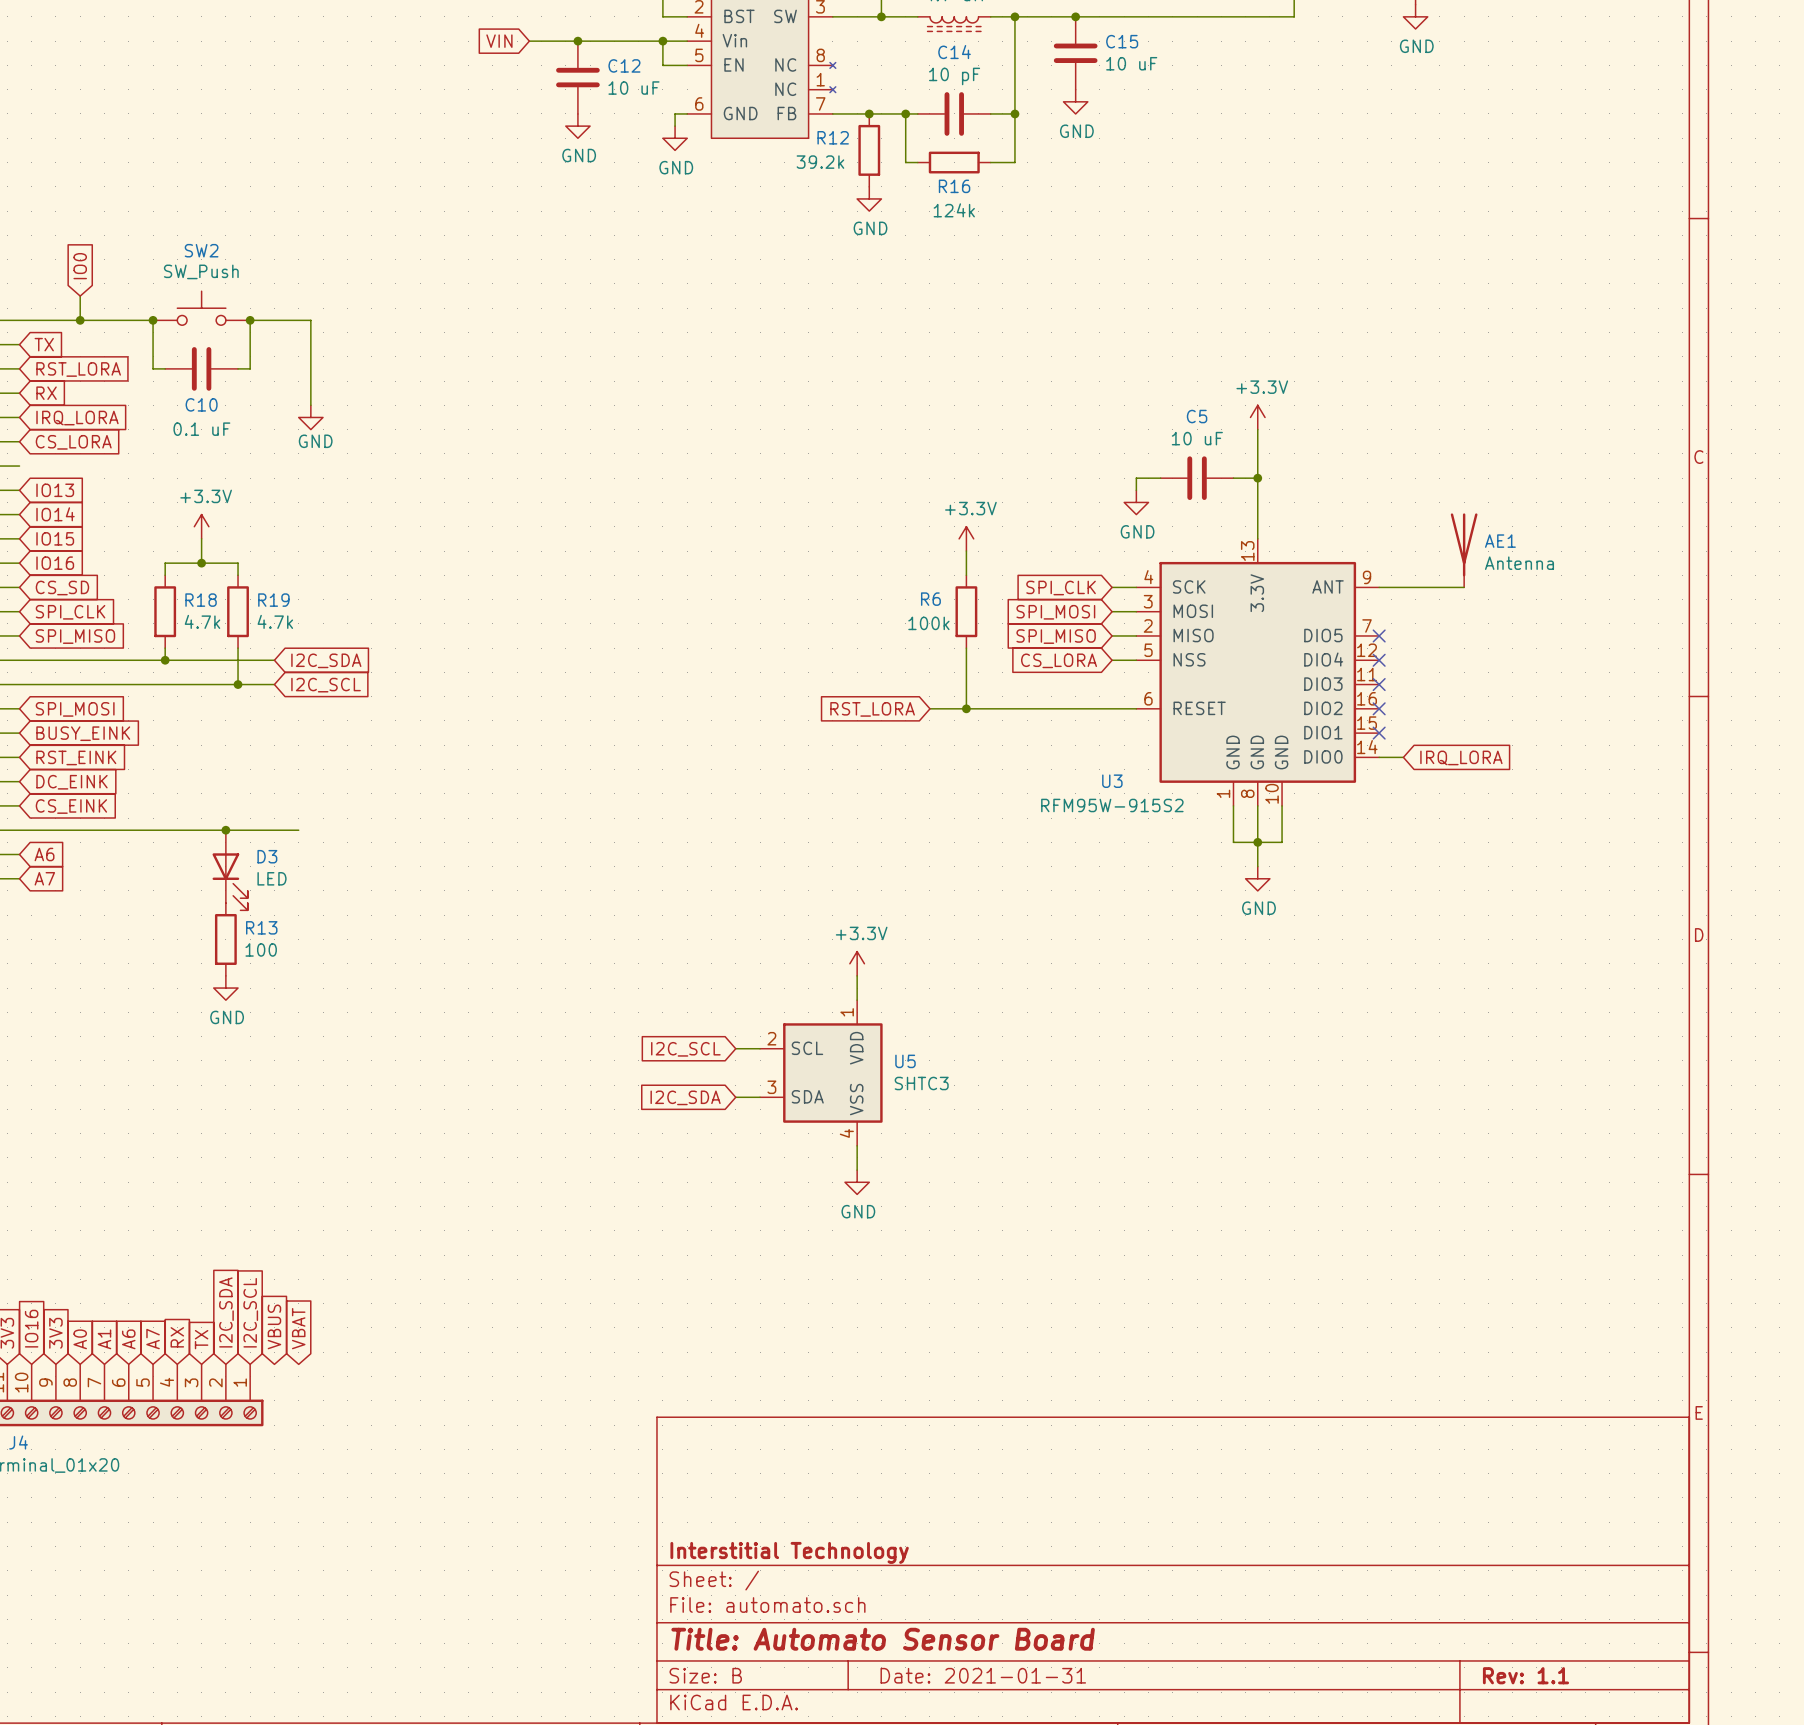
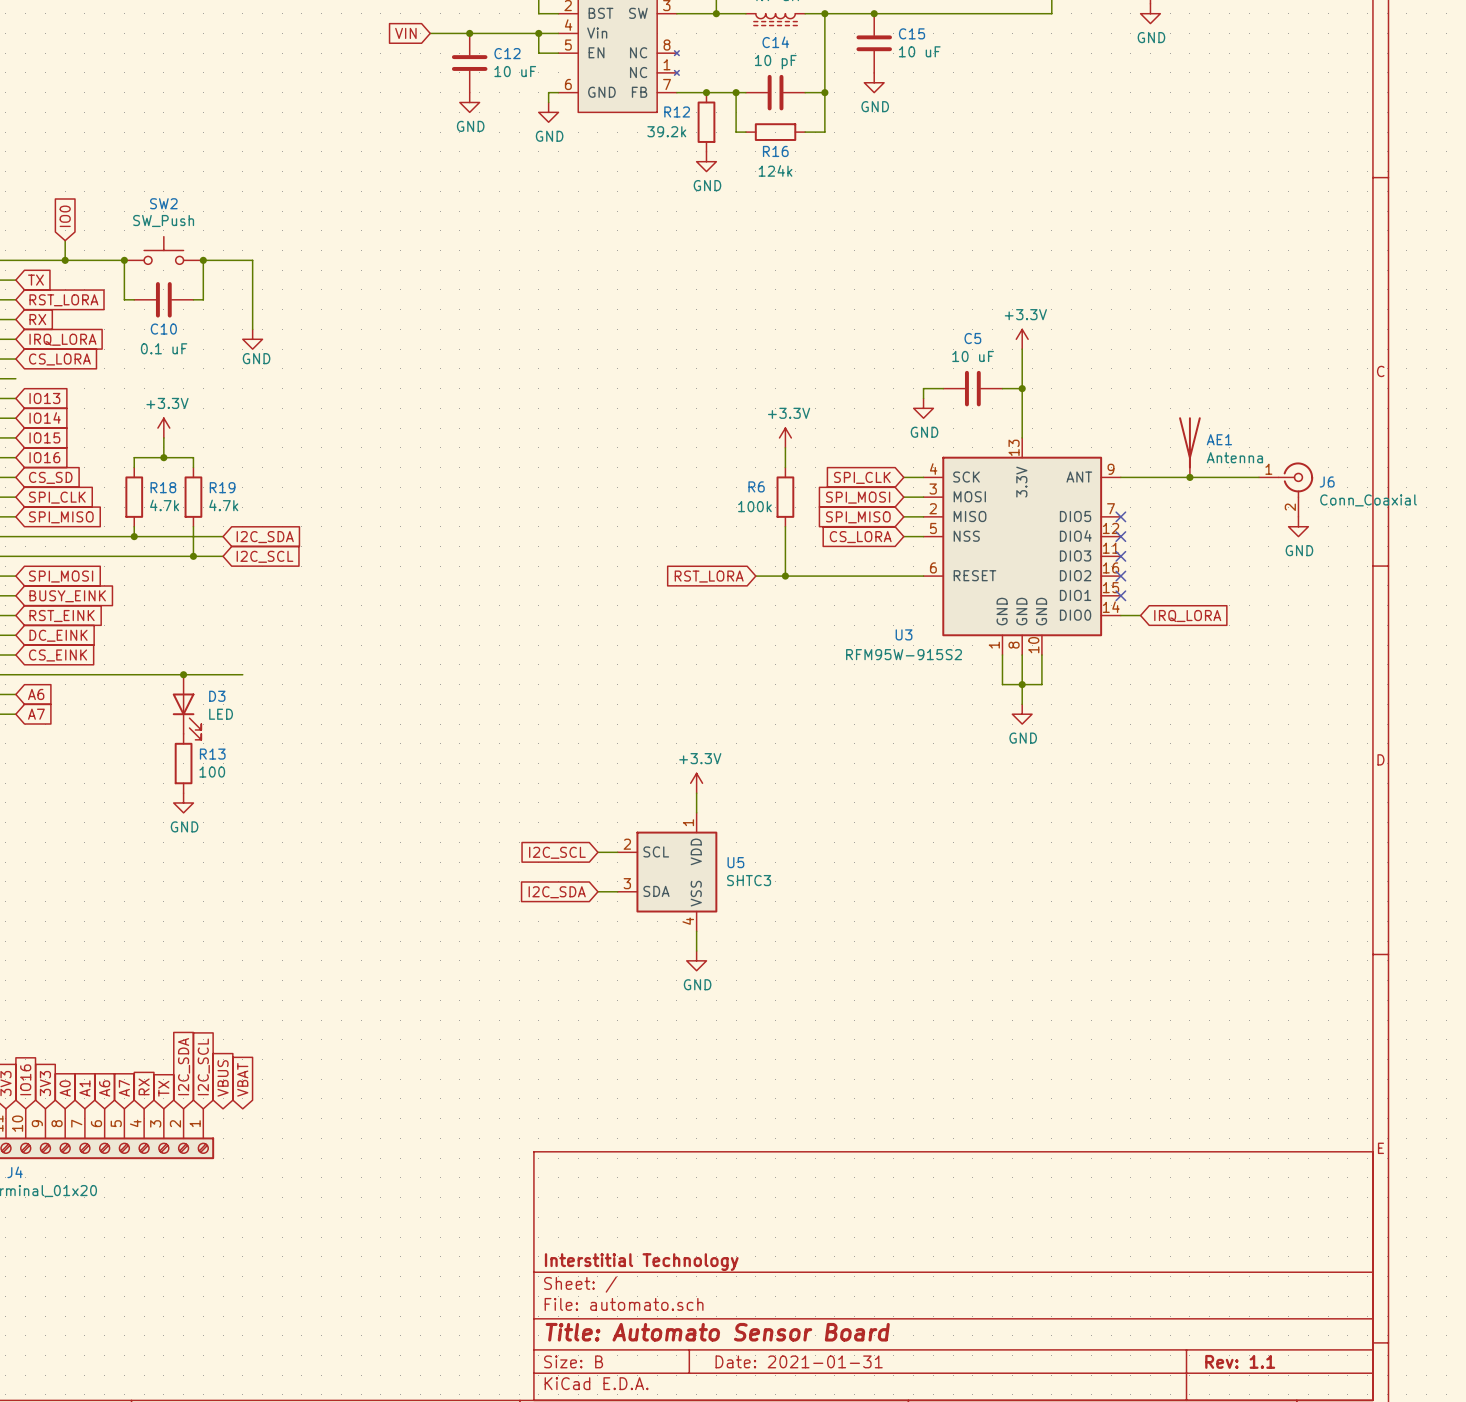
wire: none -> (1189, 477) (1258, 477)
junction: none -> (1189, 477)
J6: none -> Conn_Coaxial (1286, 489)
power symbol: none -> GND (1298, 526)

